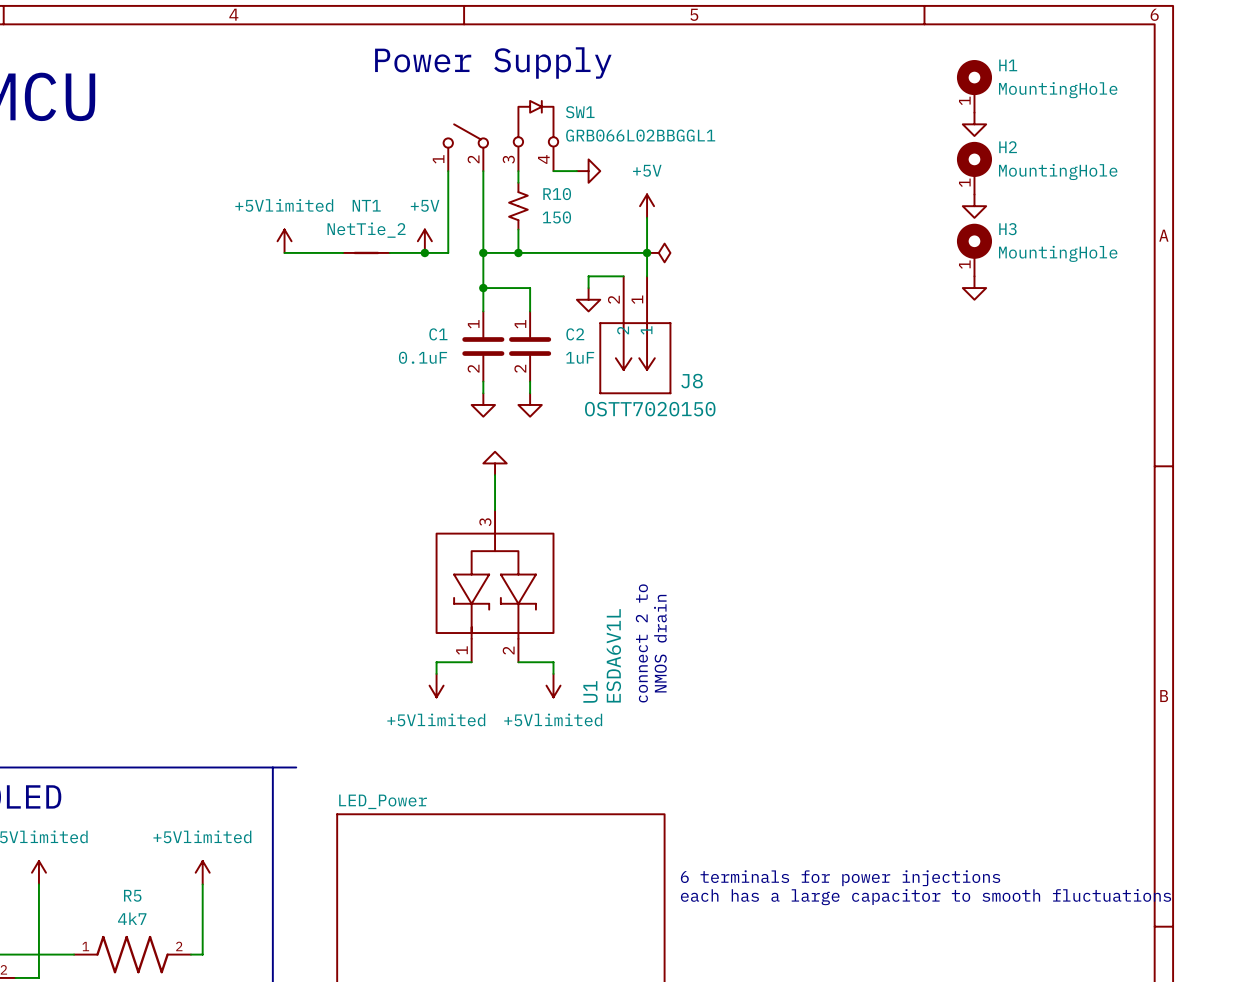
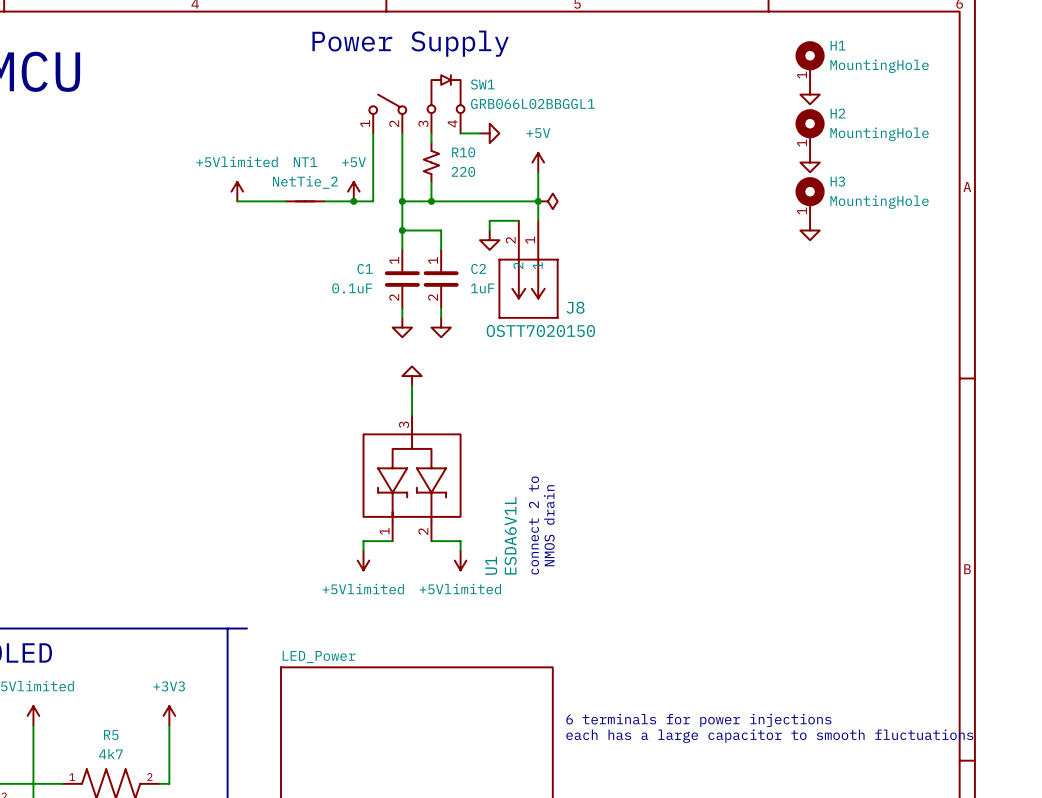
R10 value: 150 (556, 217) -> 220 (463, 171)
power symbol: +5Vlimited (202, 872) -> +3V3 (169, 715)

